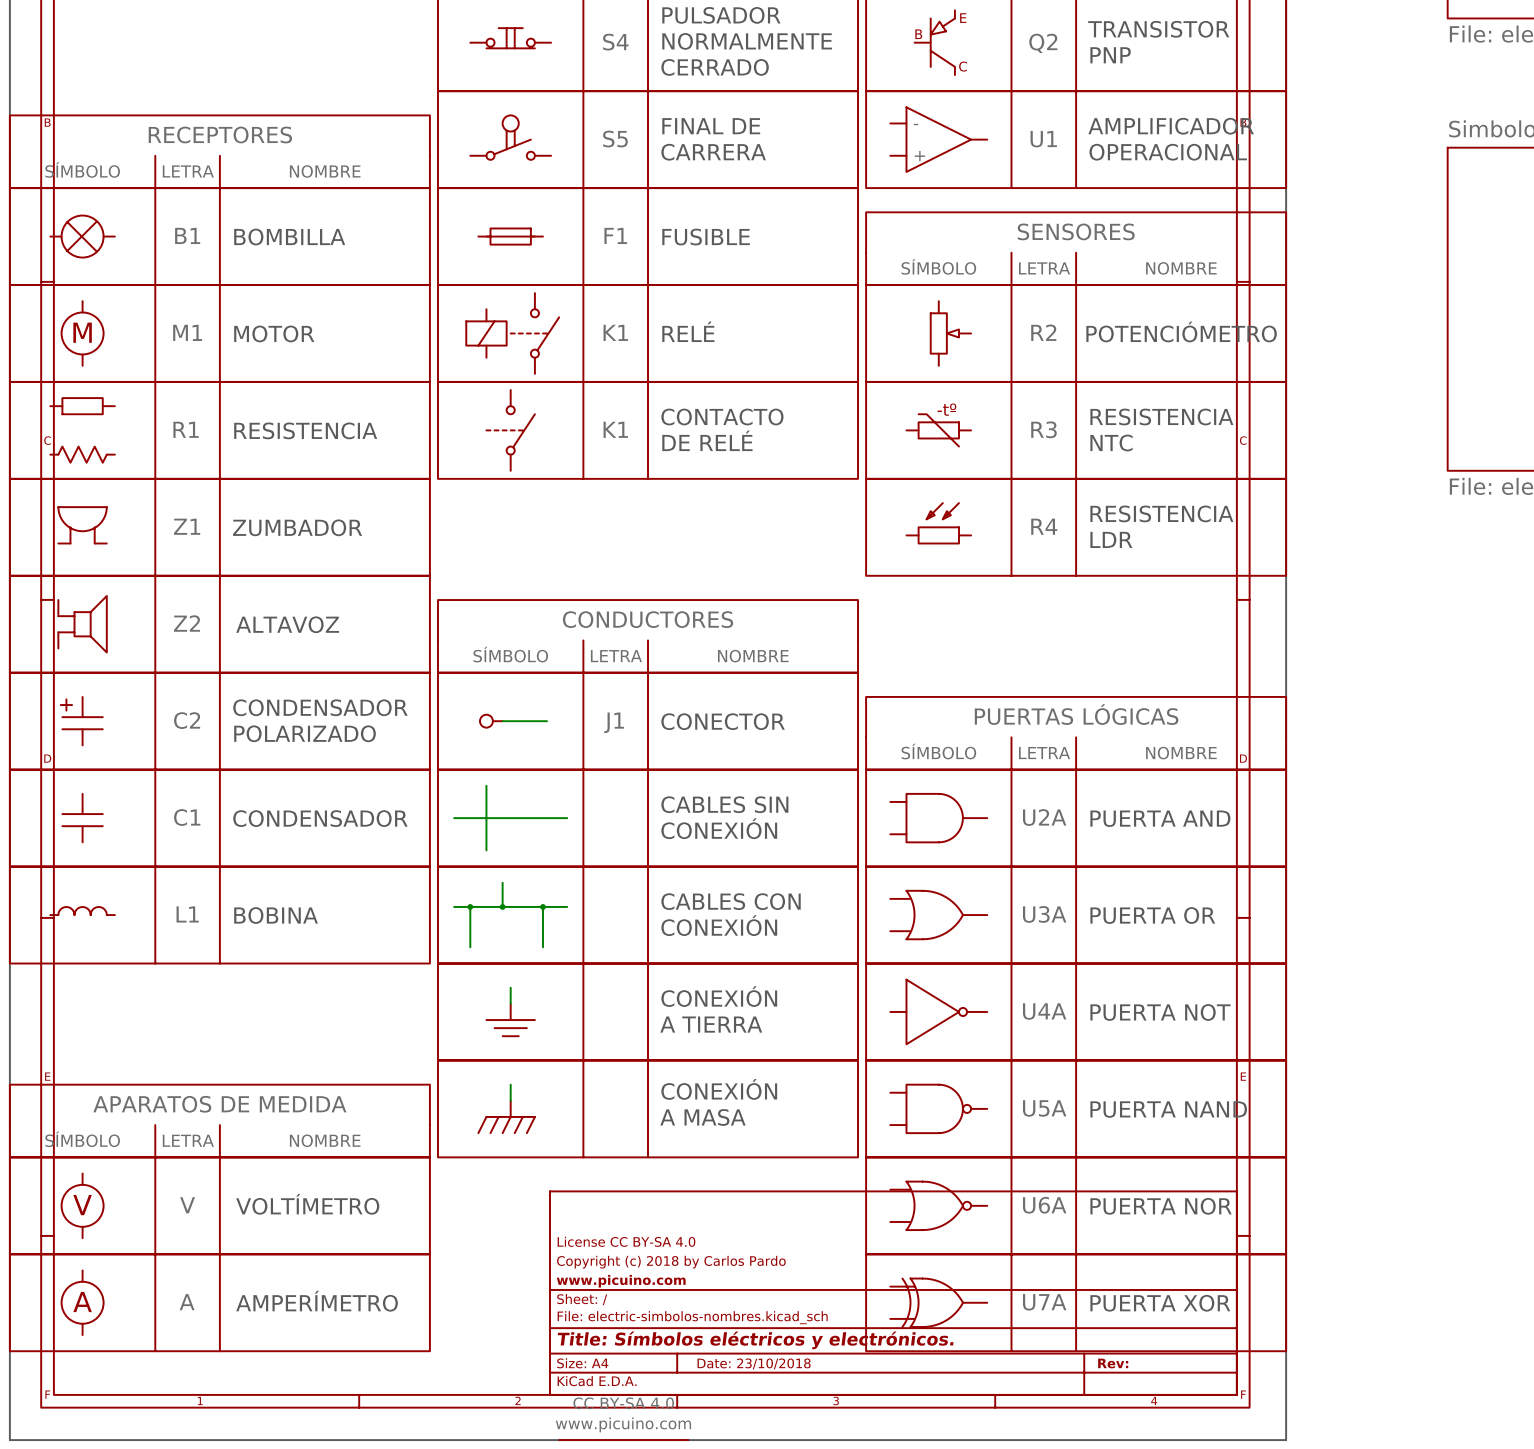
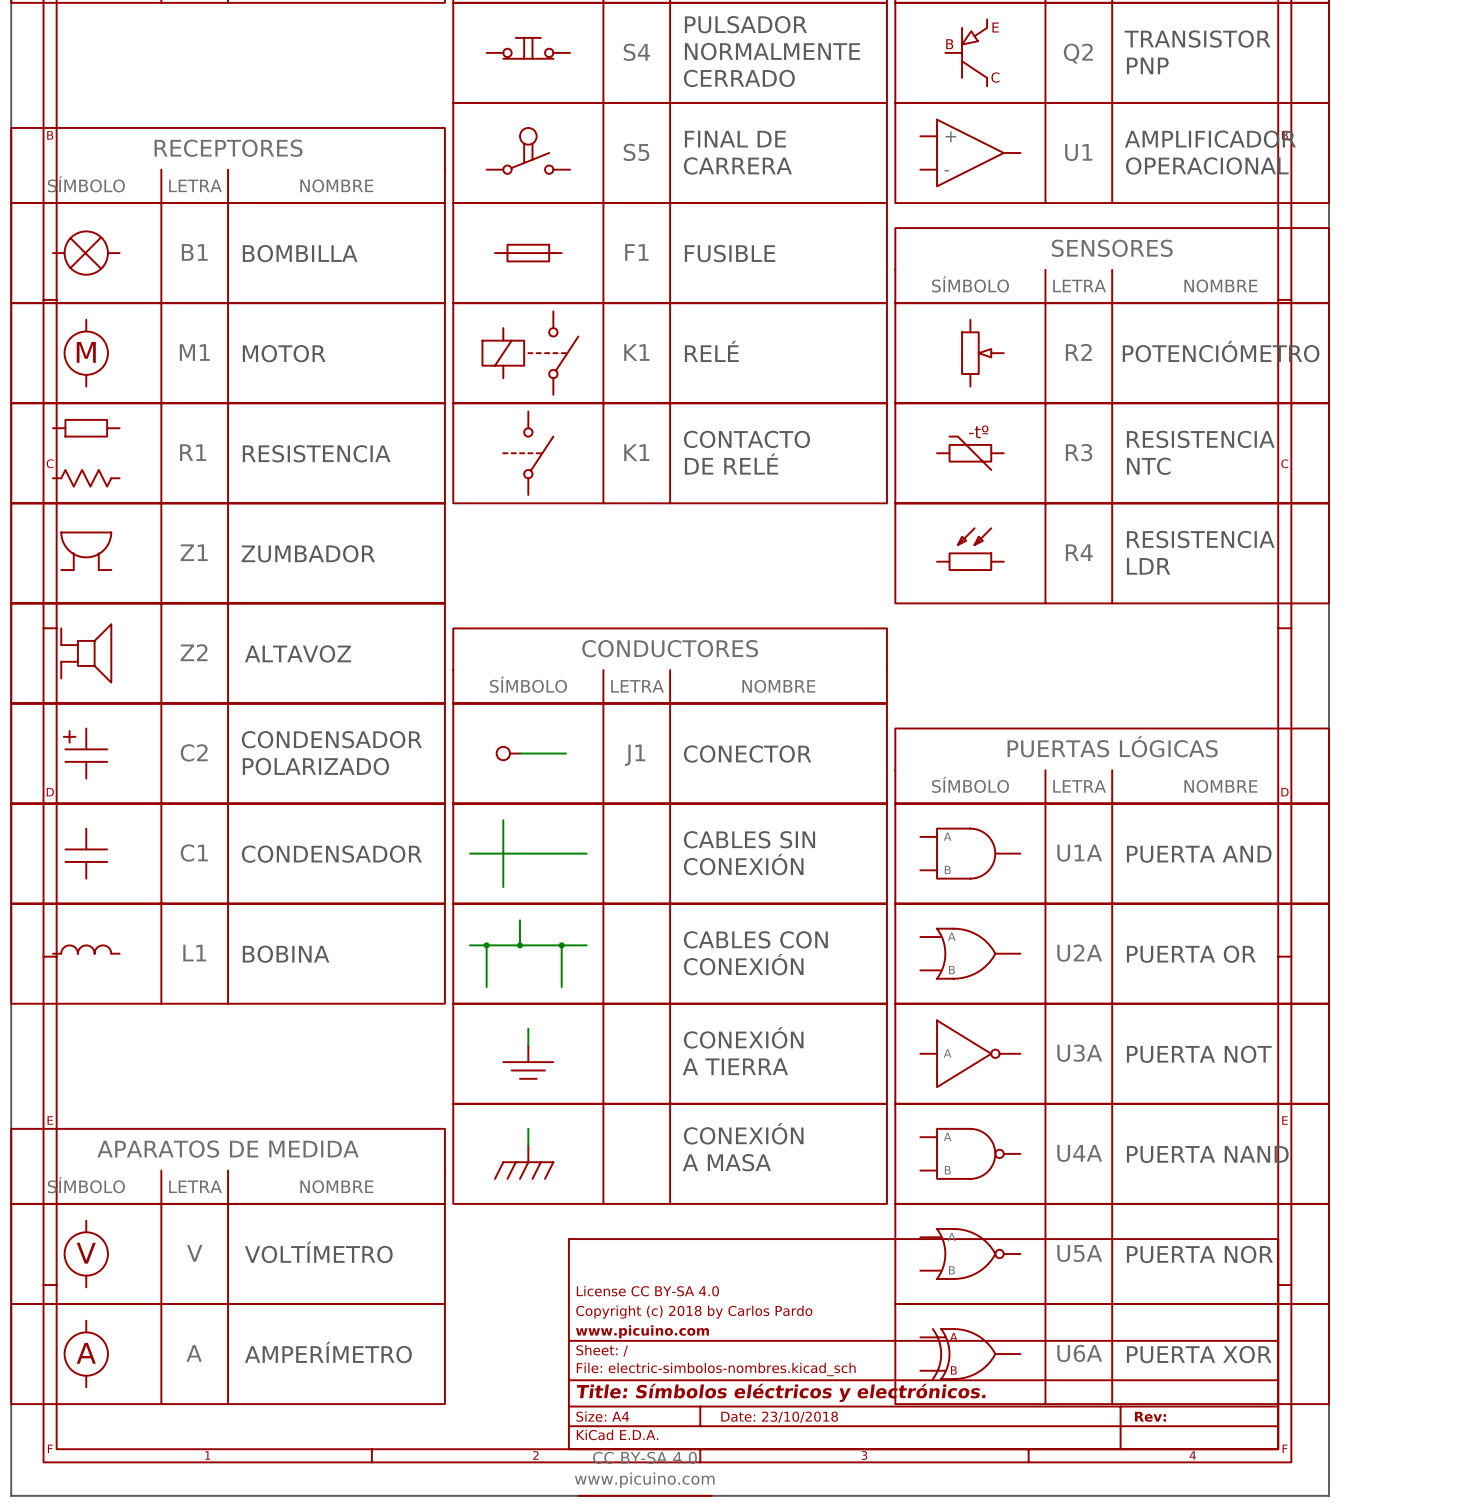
U1 flip: as is (938, 139) -> up-down (970, 152)
U2A symbol: [890, 793, 988, 843] -> [920, 928, 1021, 979]
U1A: none -> (970, 853)
U3A symbol: [890, 890, 988, 940] -> [920, 1020, 1021, 1088]
U4A symbol: [890, 979, 988, 1045] -> [920, 1128, 1021, 1179]
U5A symbol: [890, 1084, 988, 1134] -> [920, 1228, 1021, 1279]
U6A symbol: [890, 1181, 988, 1231] -> [920, 1329, 1021, 1380]
U7A: (938, 1302) -> none

